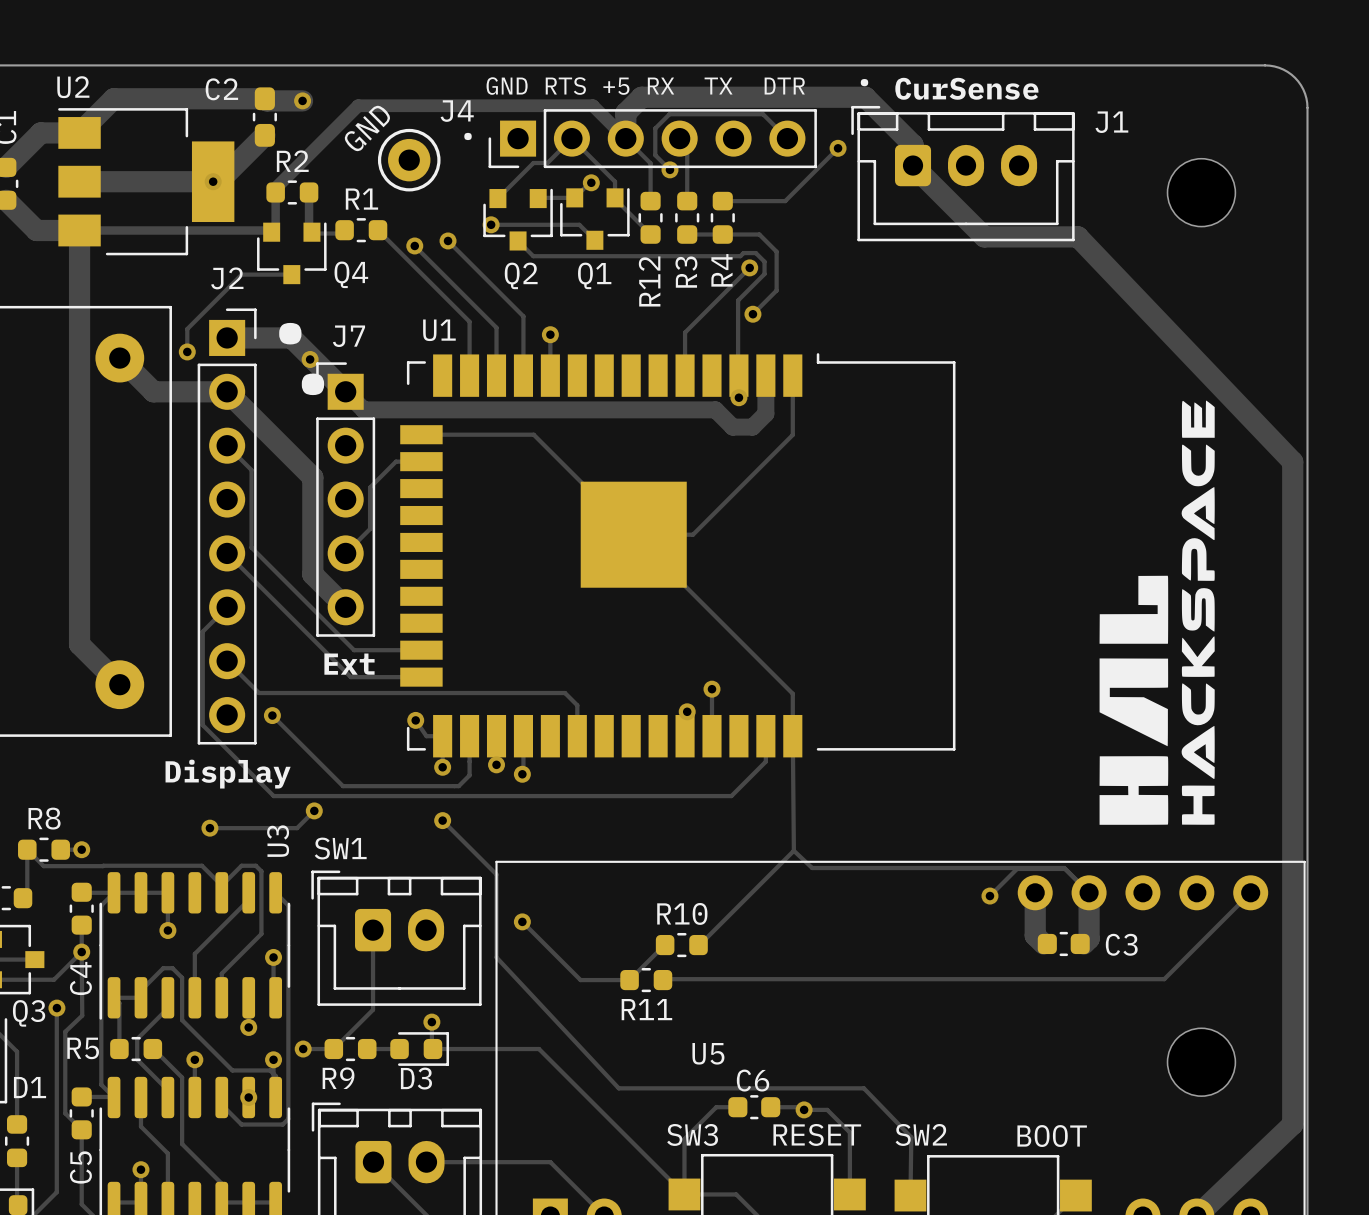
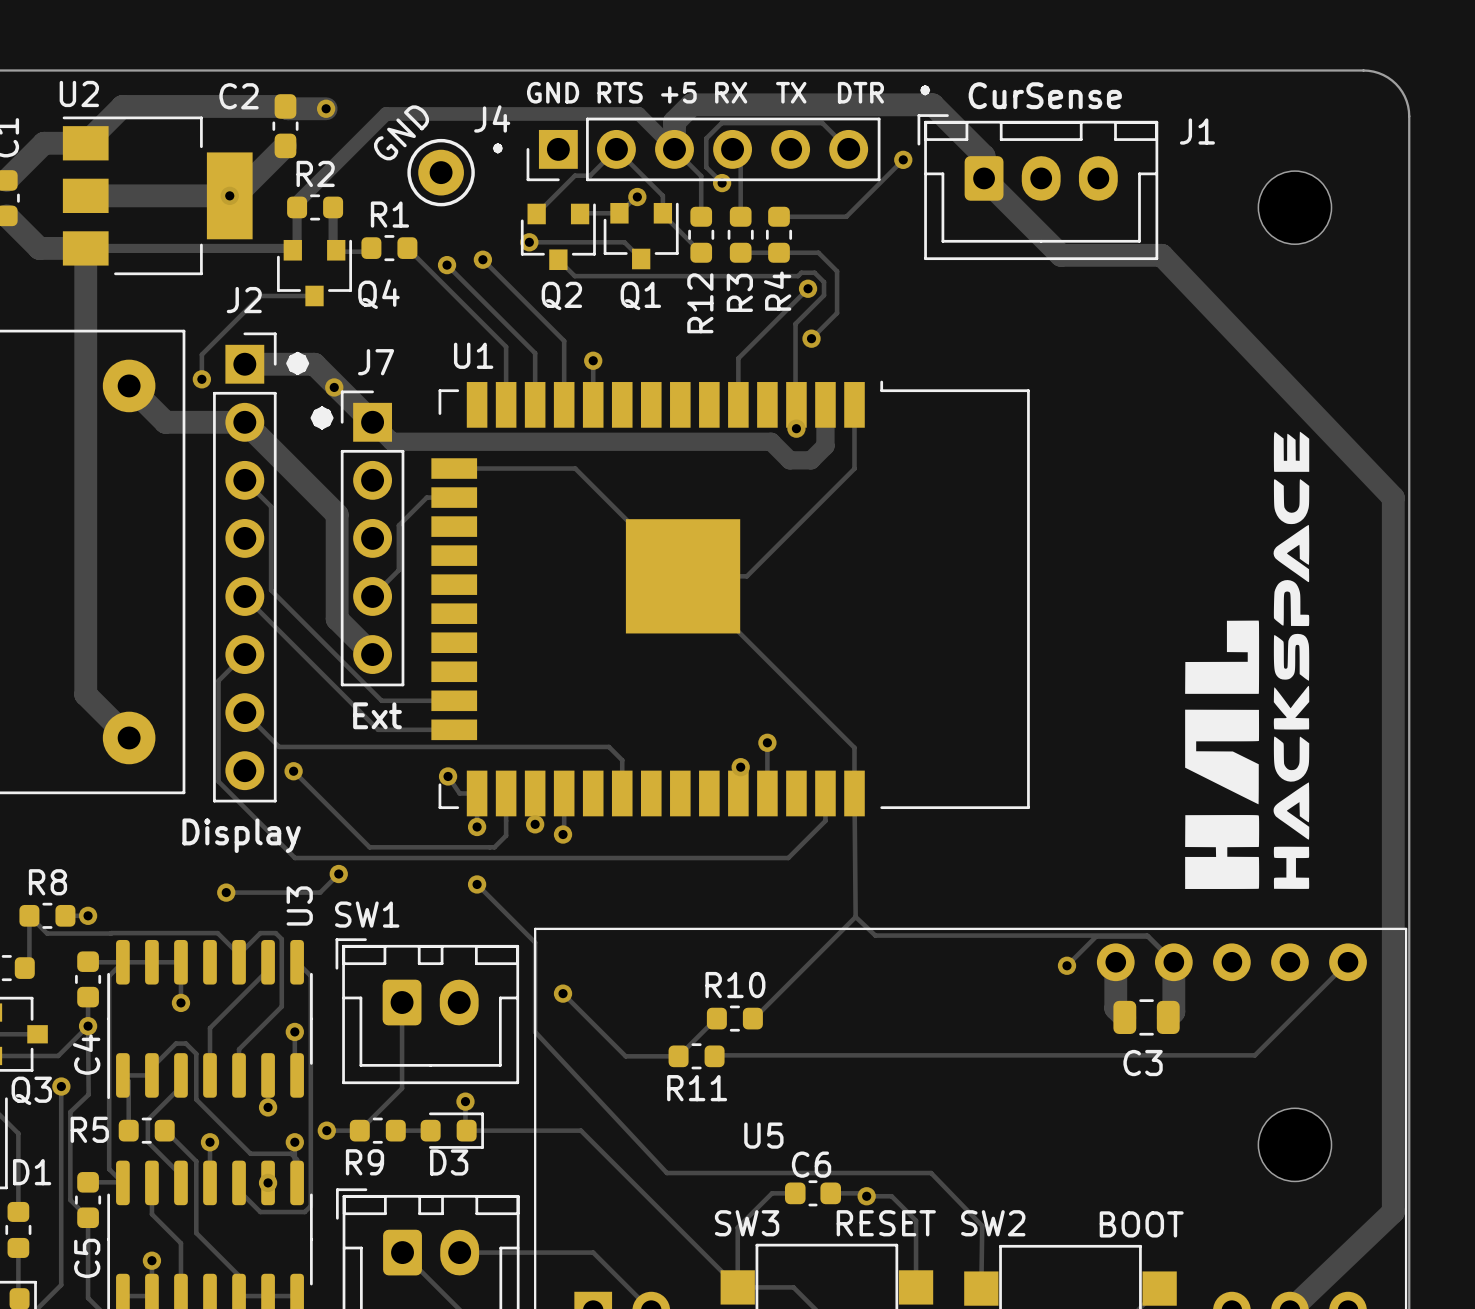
C3 footprint: [1037, 931, 1090, 957] -> [1113, 999, 1180, 1036]
C3 name position: C3 (1121, 944) -> C3 (1143, 1063)

